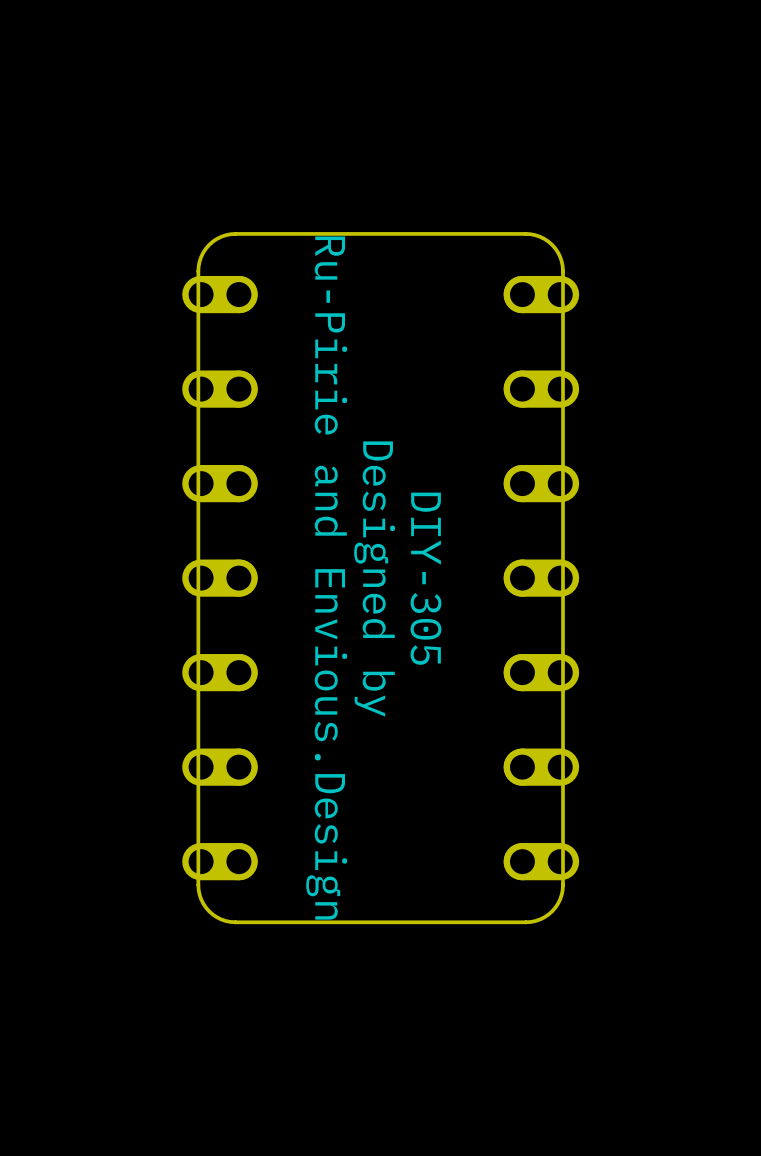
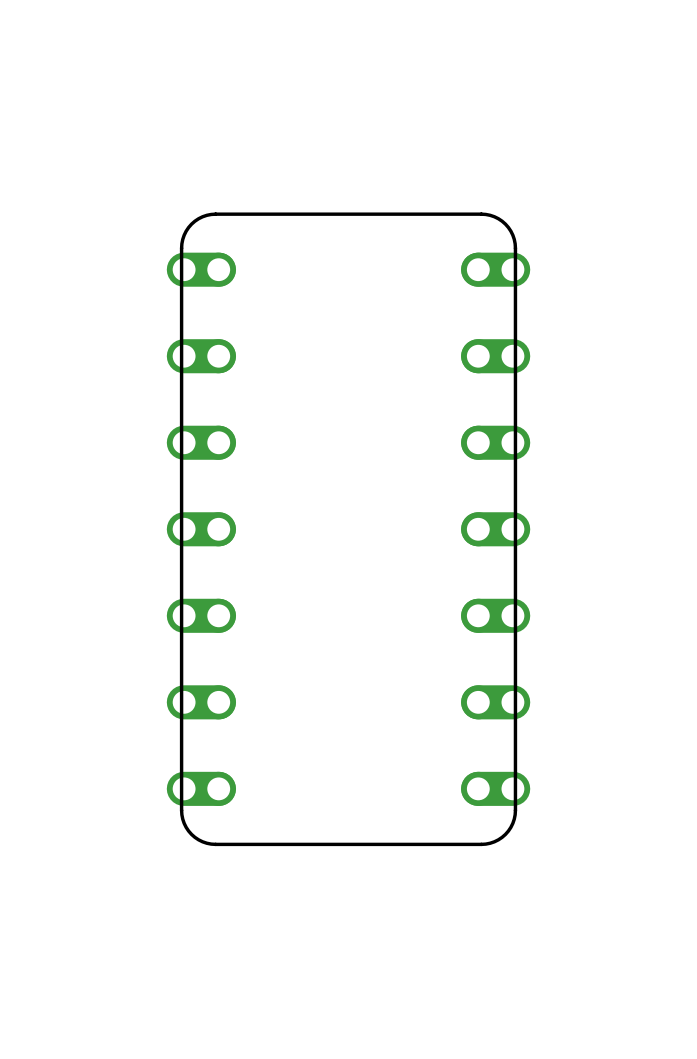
text: Ru-Pirie and Envious.Design (326, 578) -> none
text: DIY-305 (425, 578) -> none
text: Designed by (374, 579) -> none

